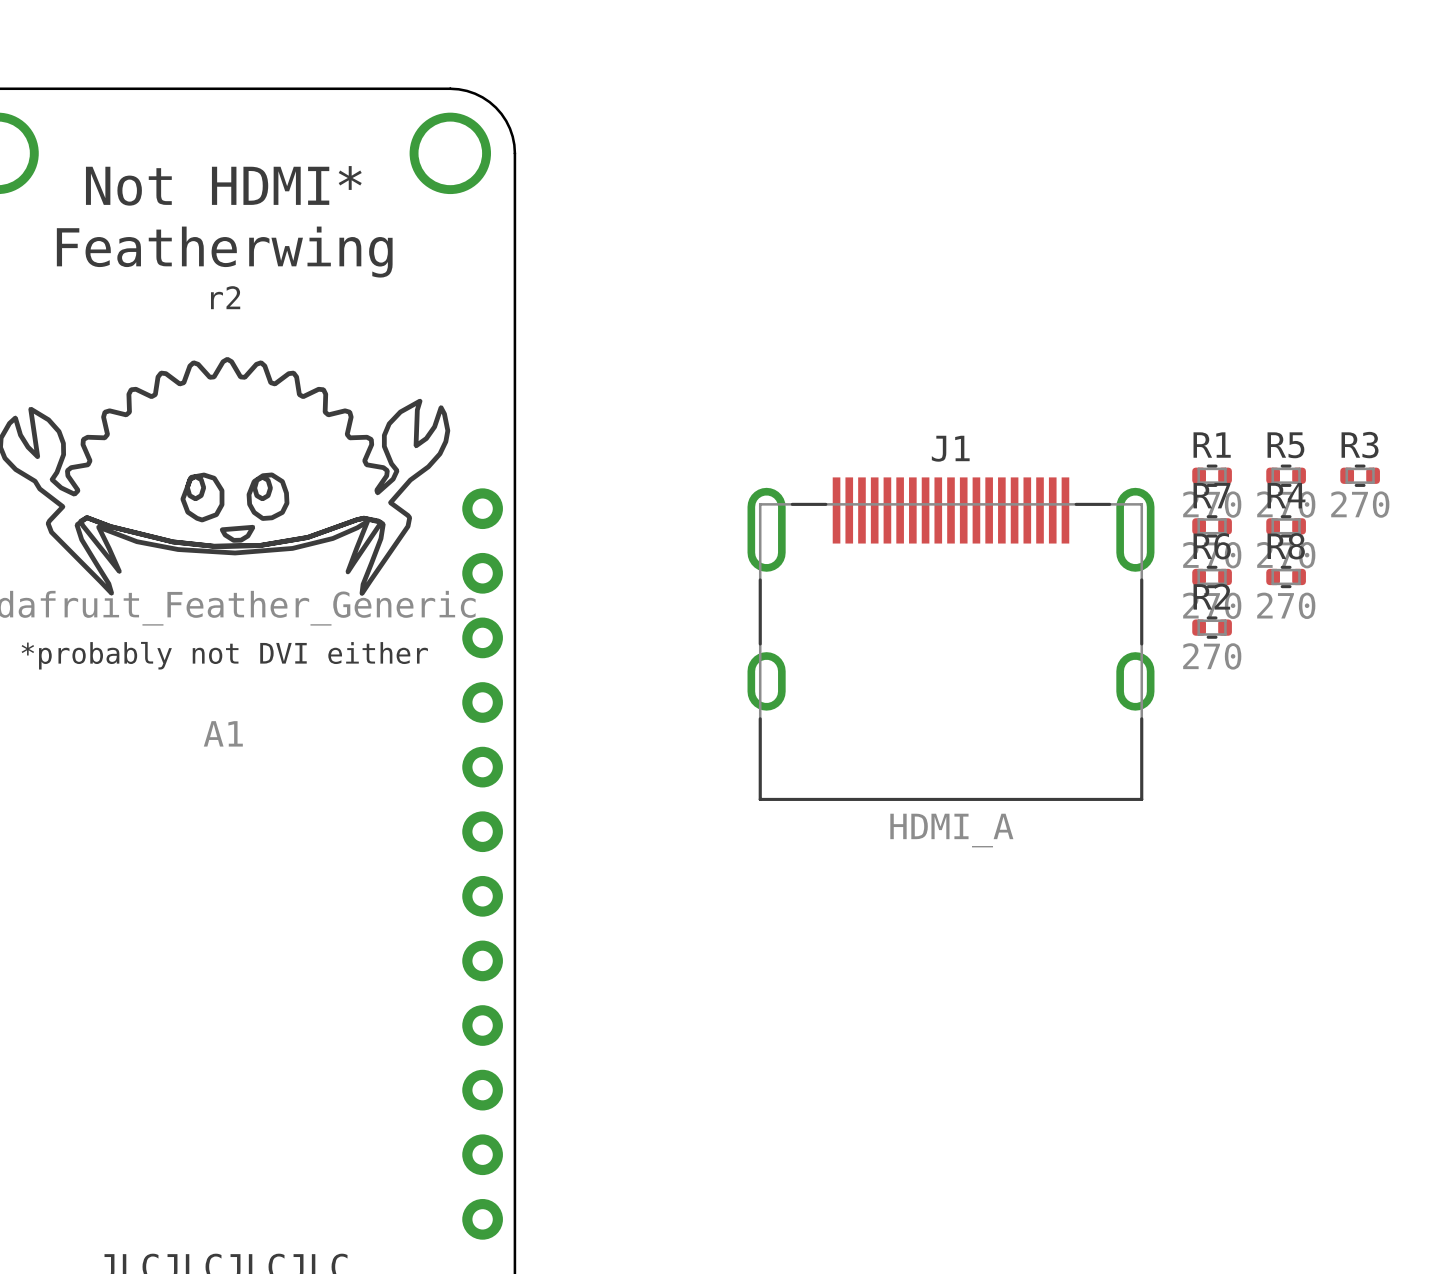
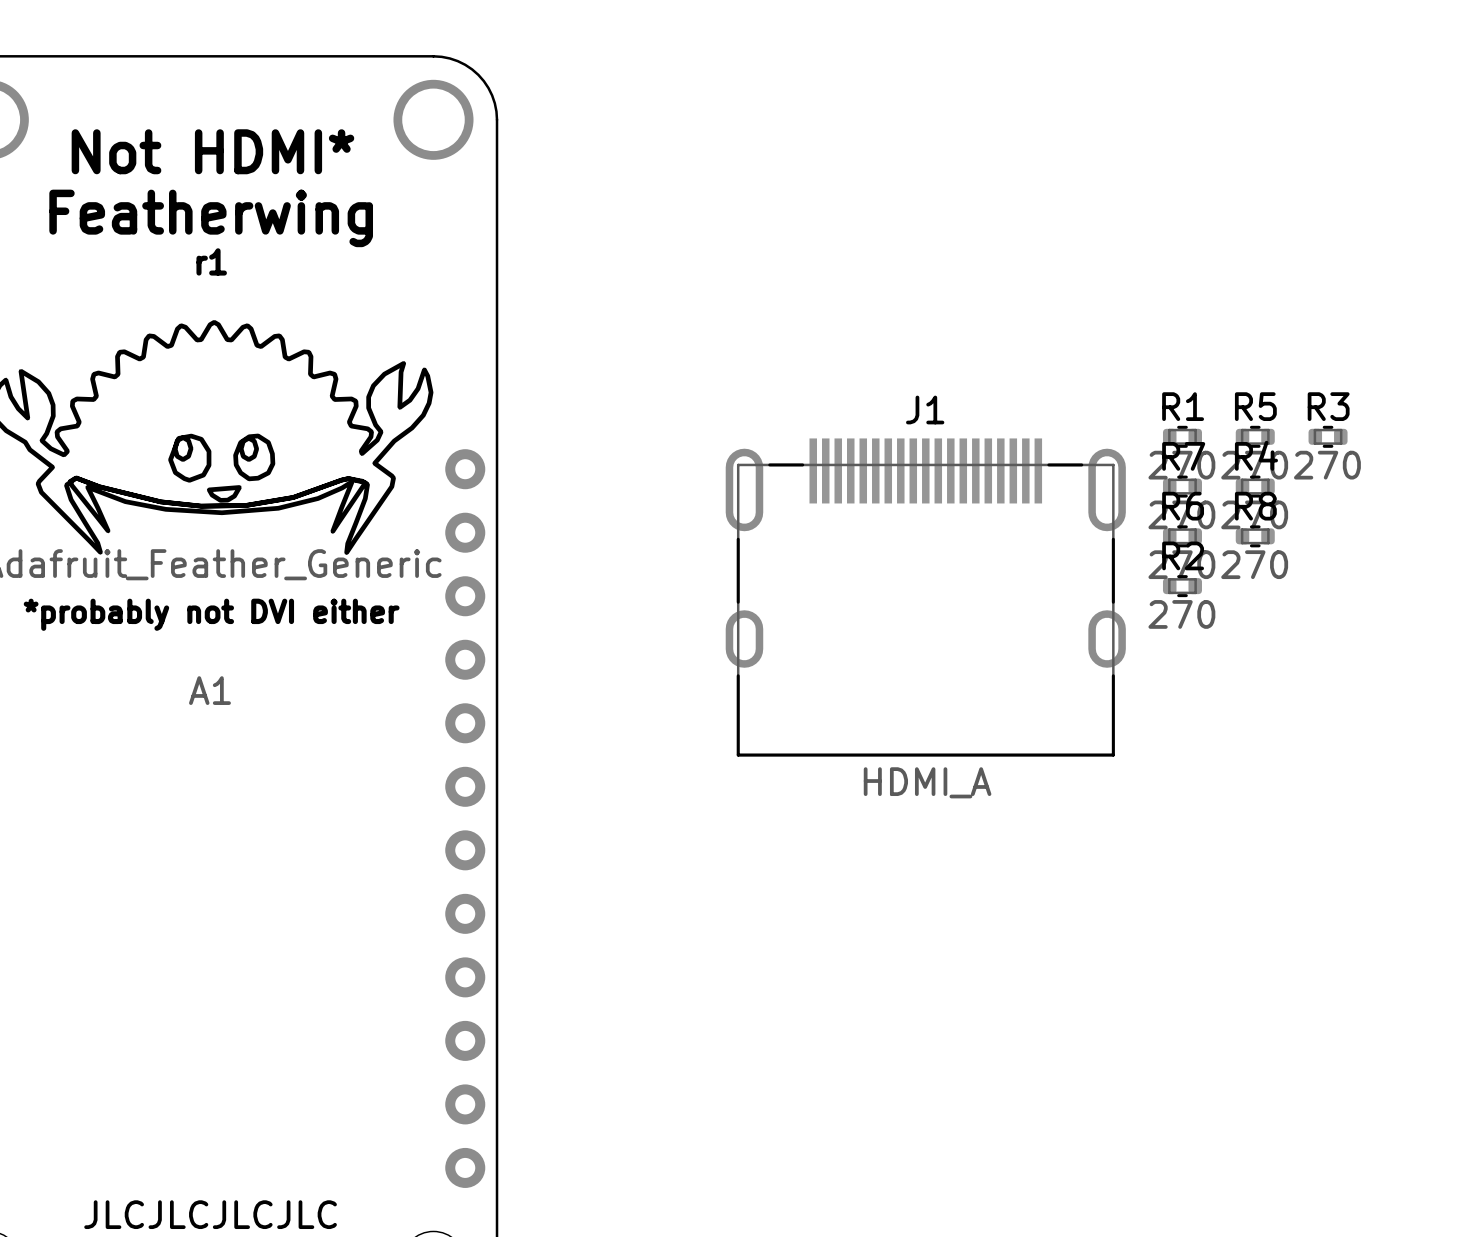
text: r2 (225, 297) -> r1 (211, 261)

